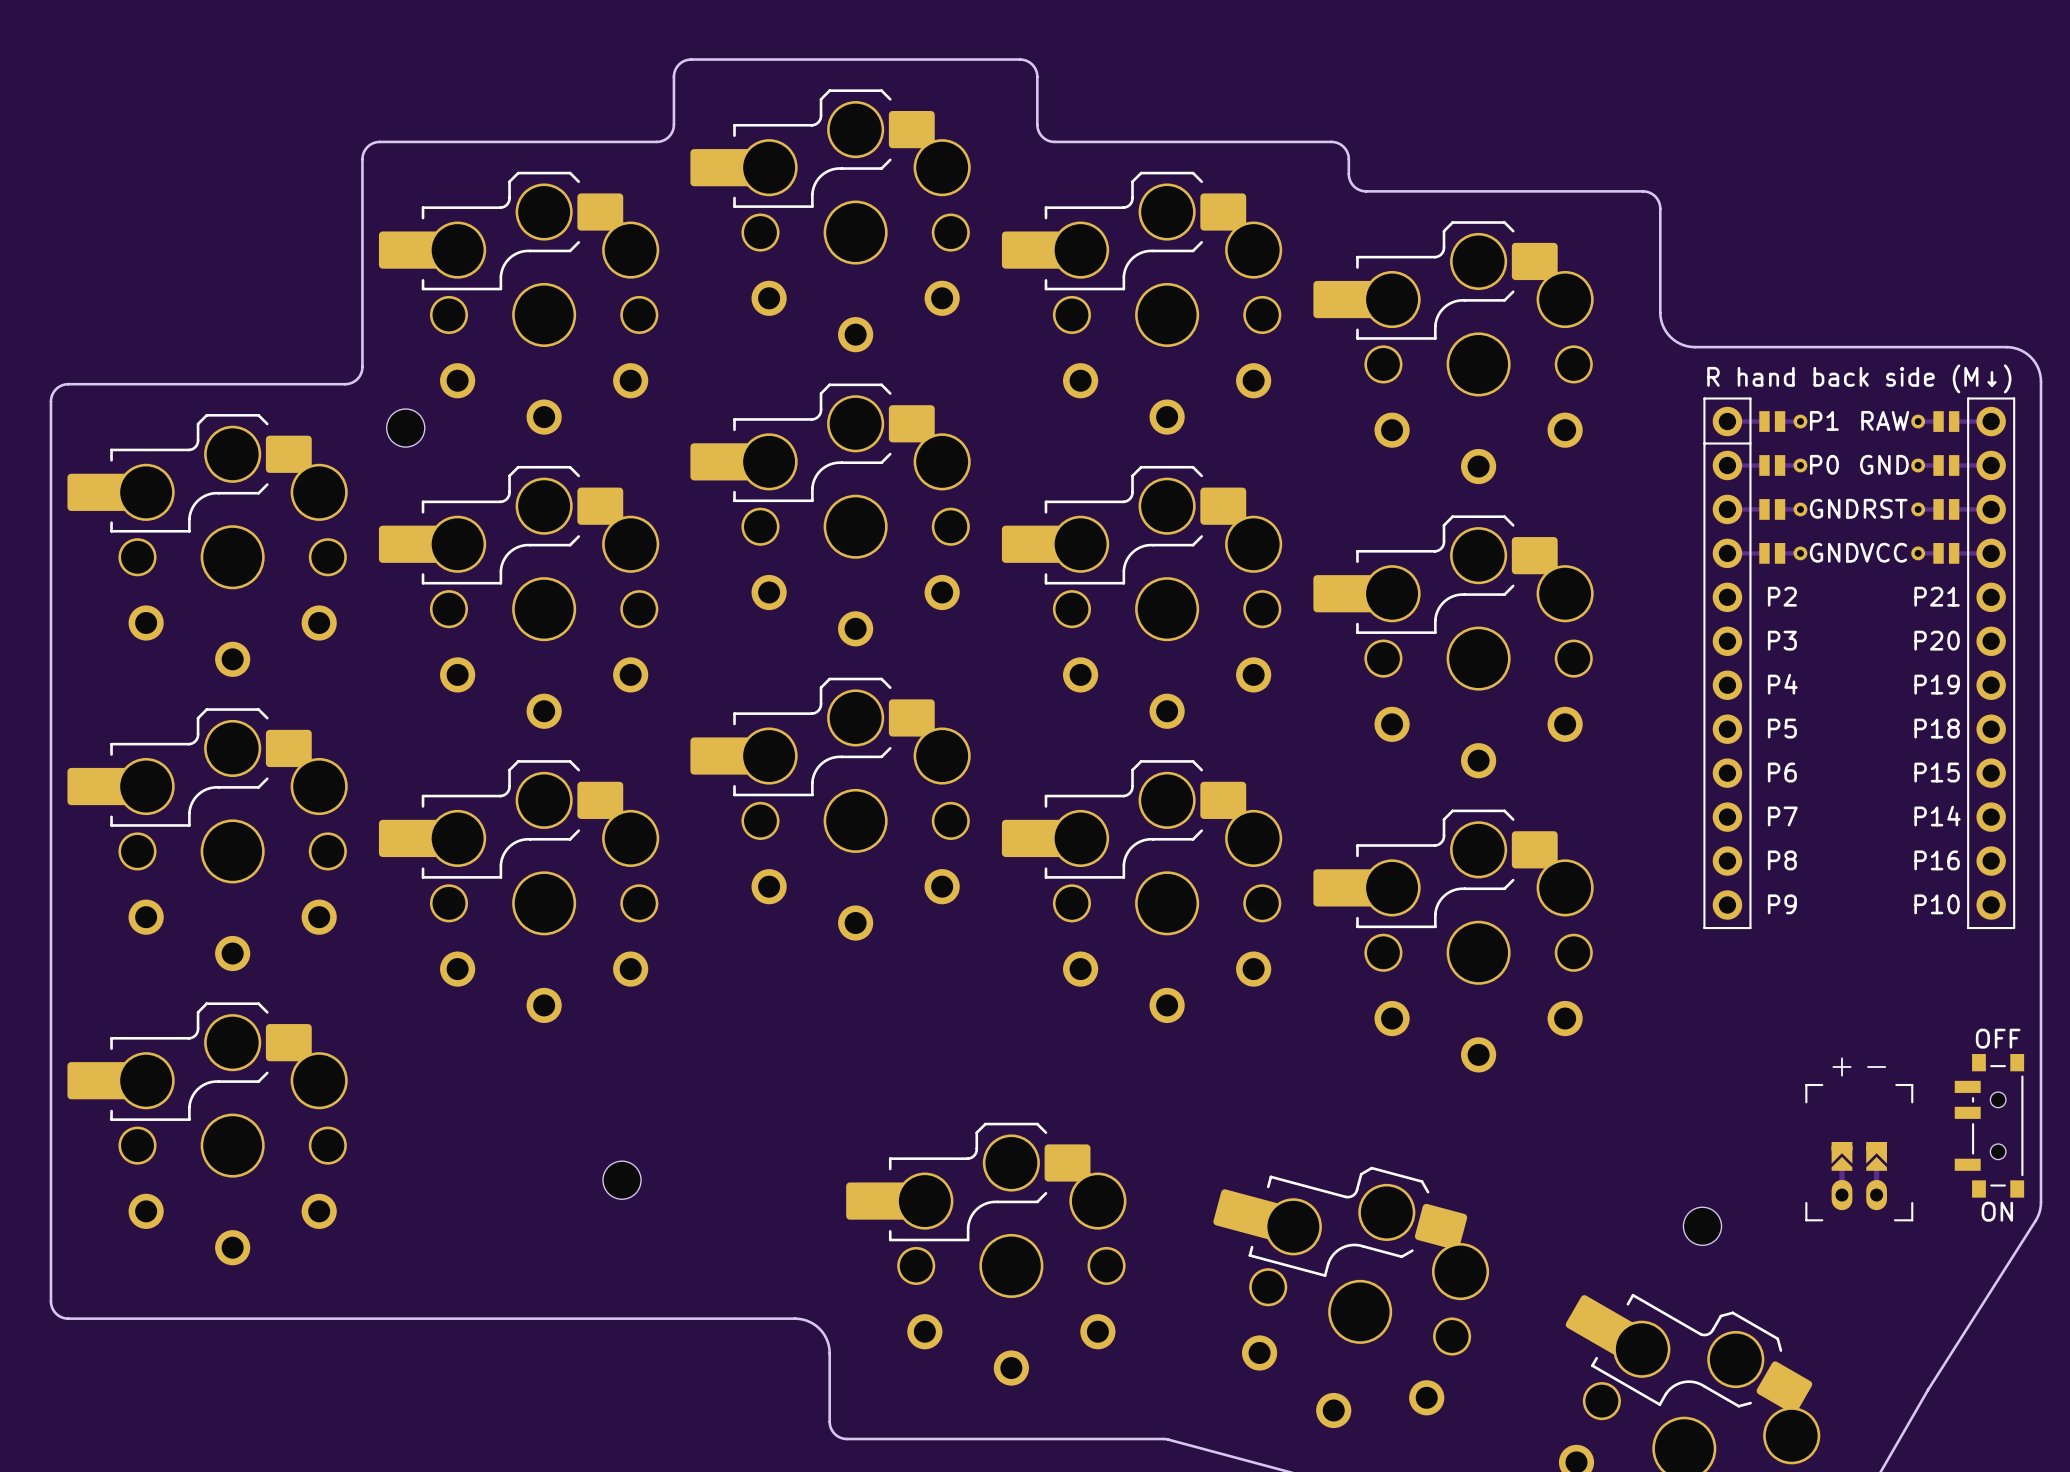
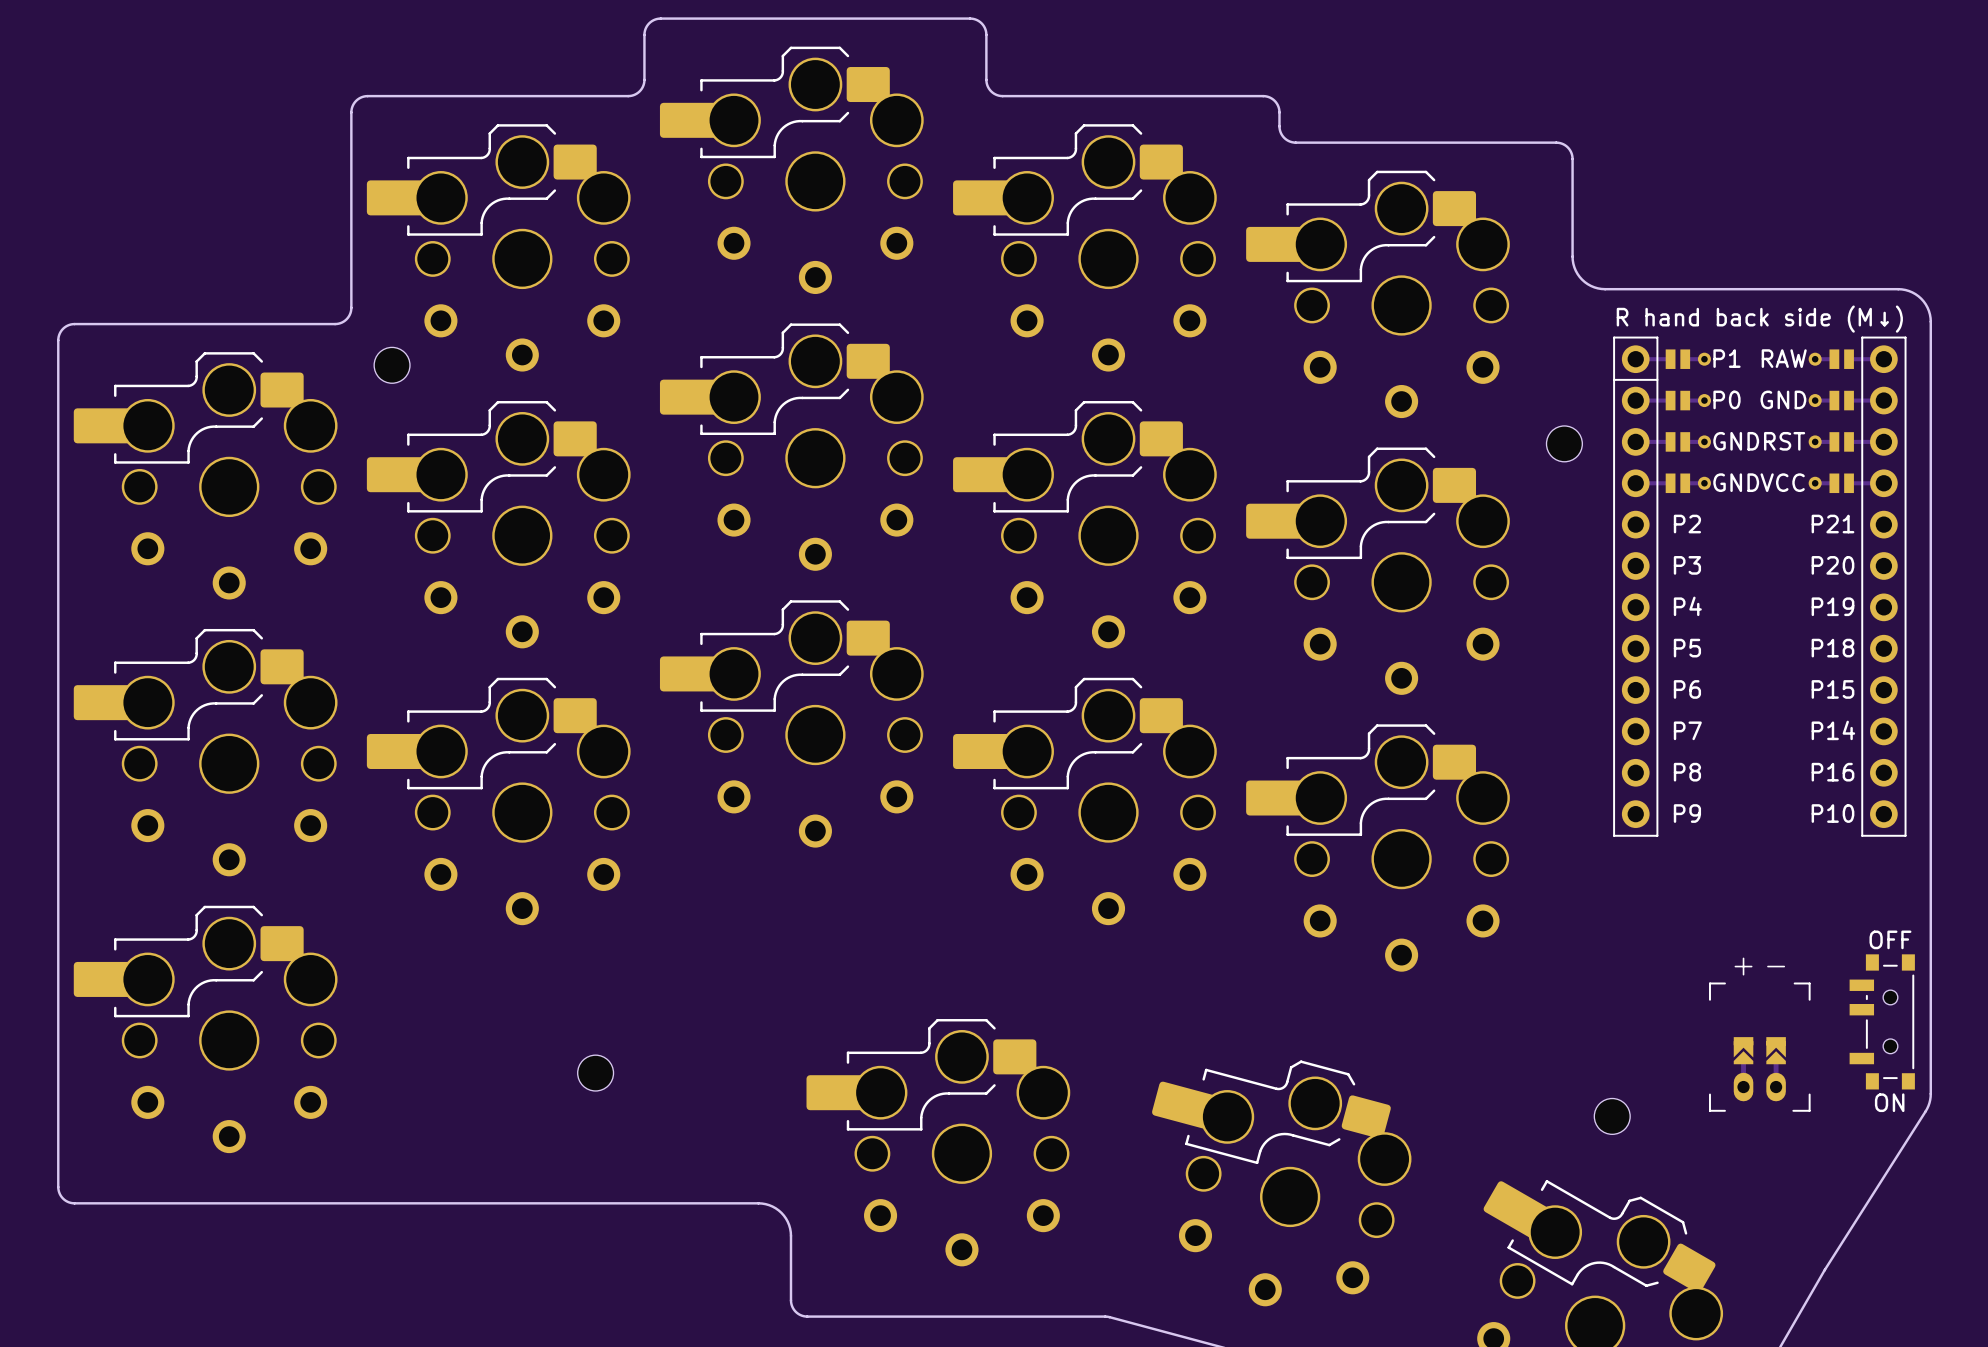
part: none -> (1564, 443)

